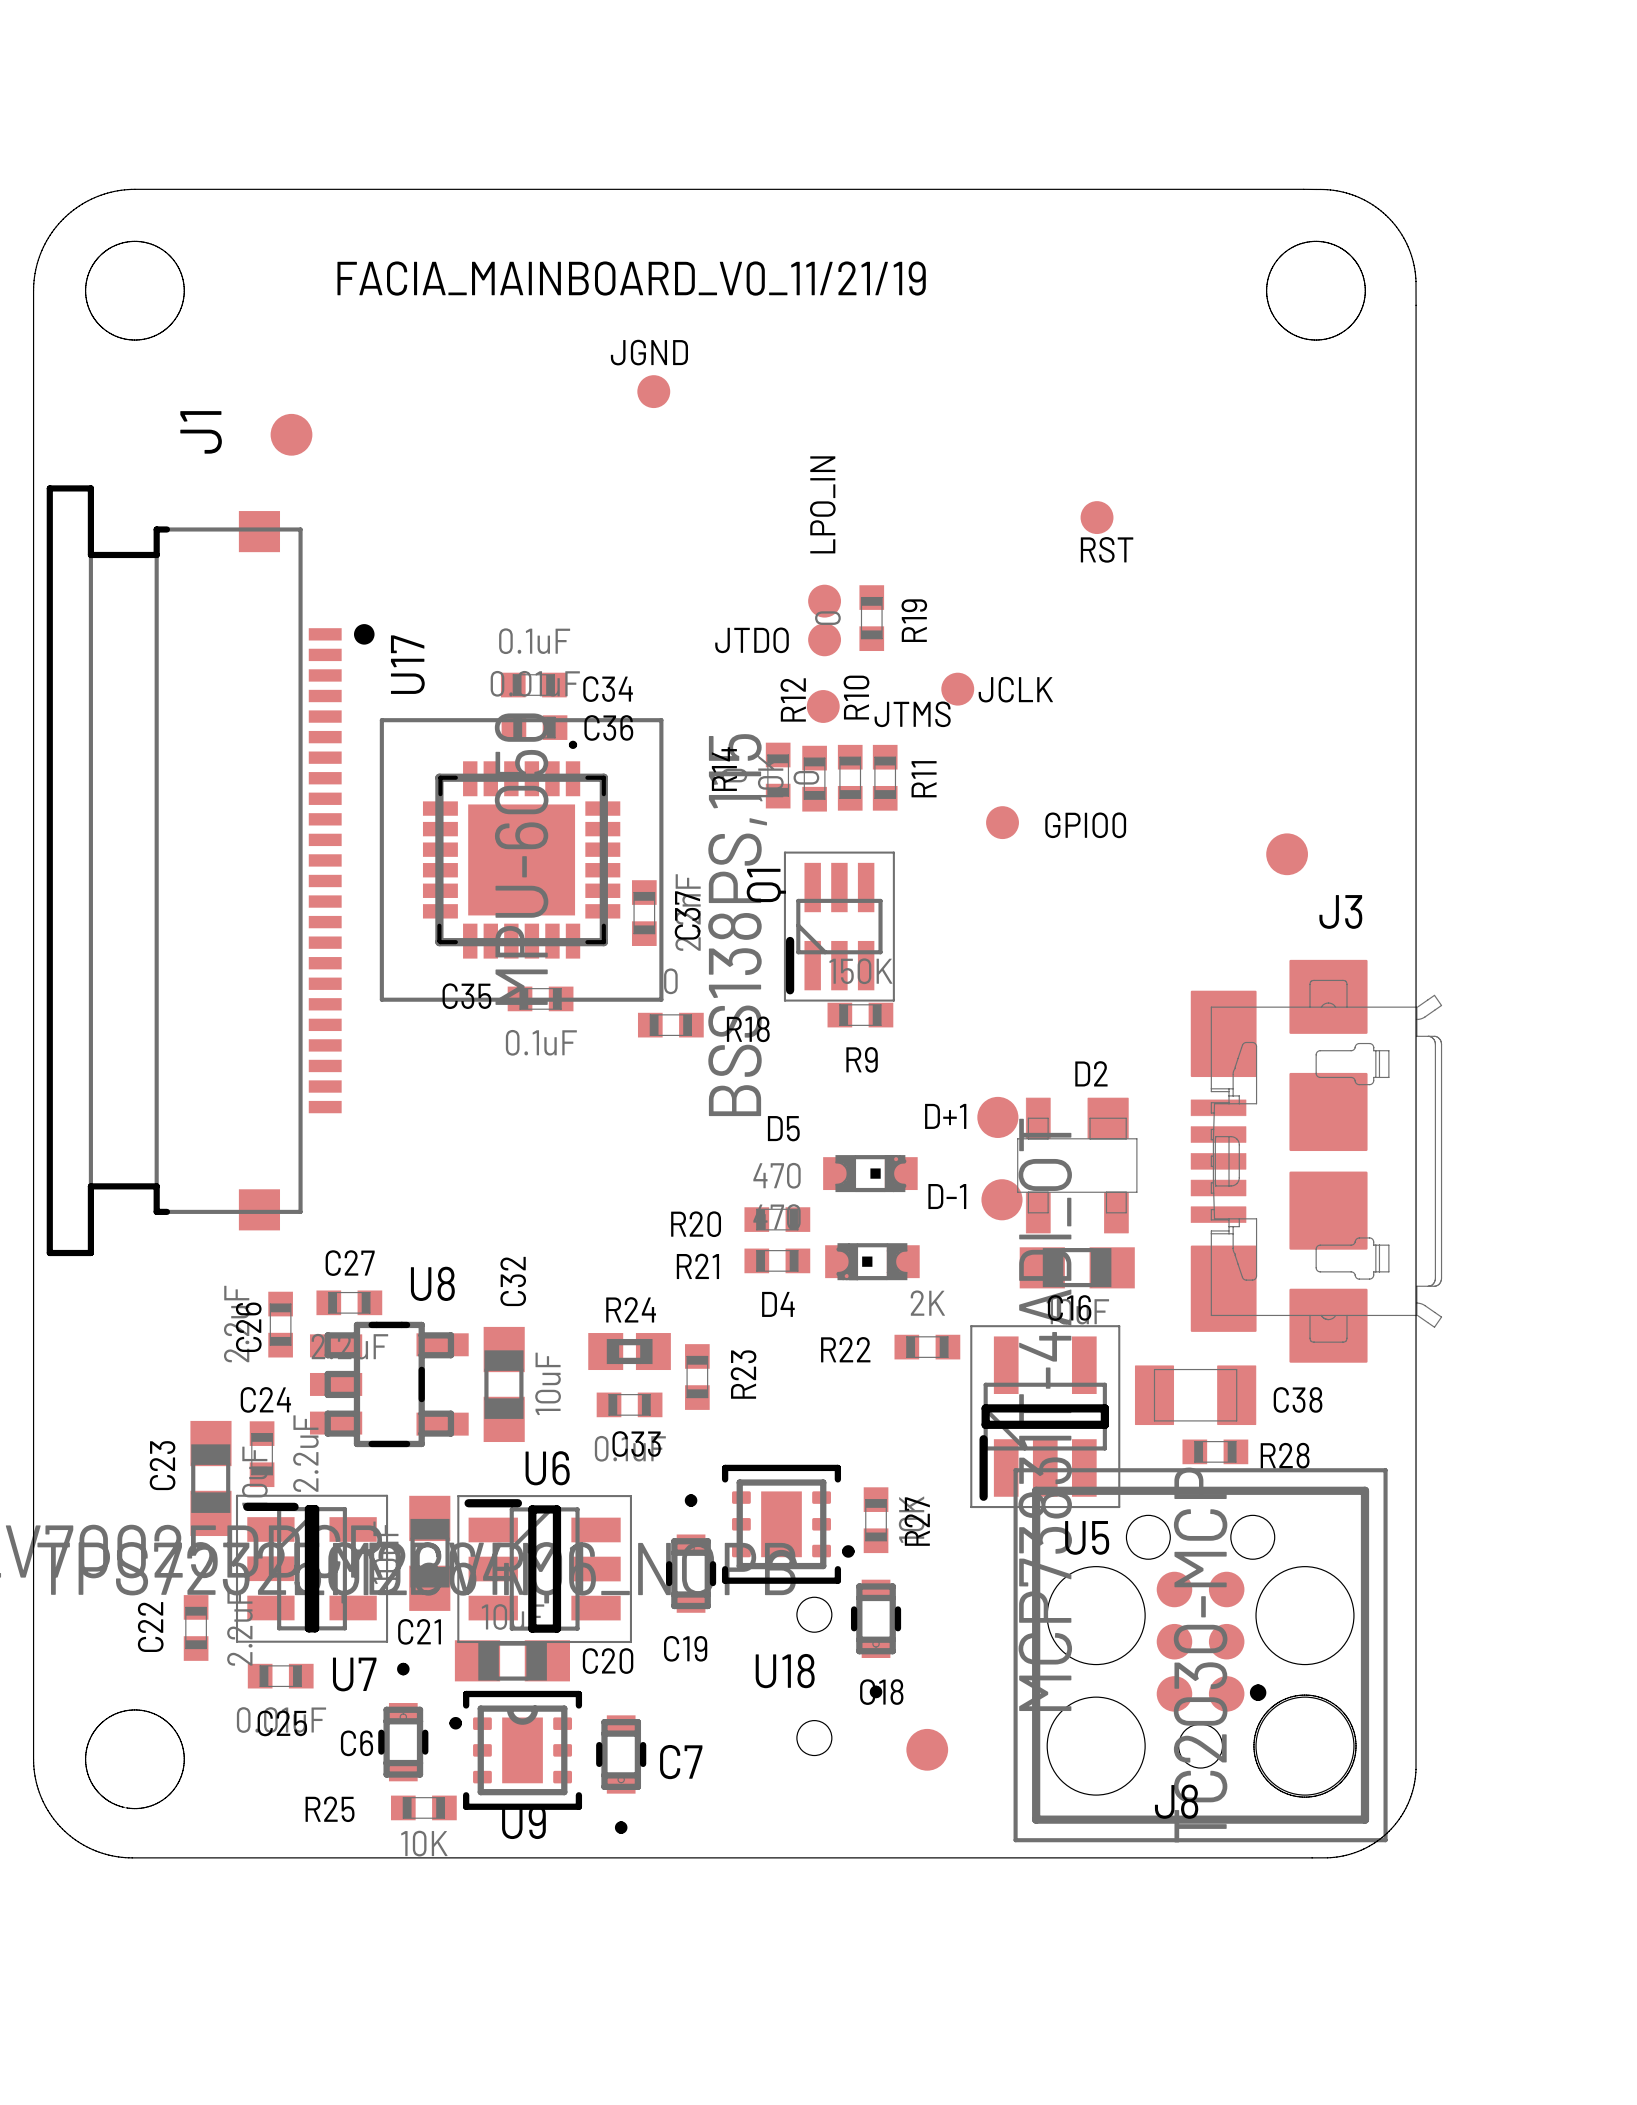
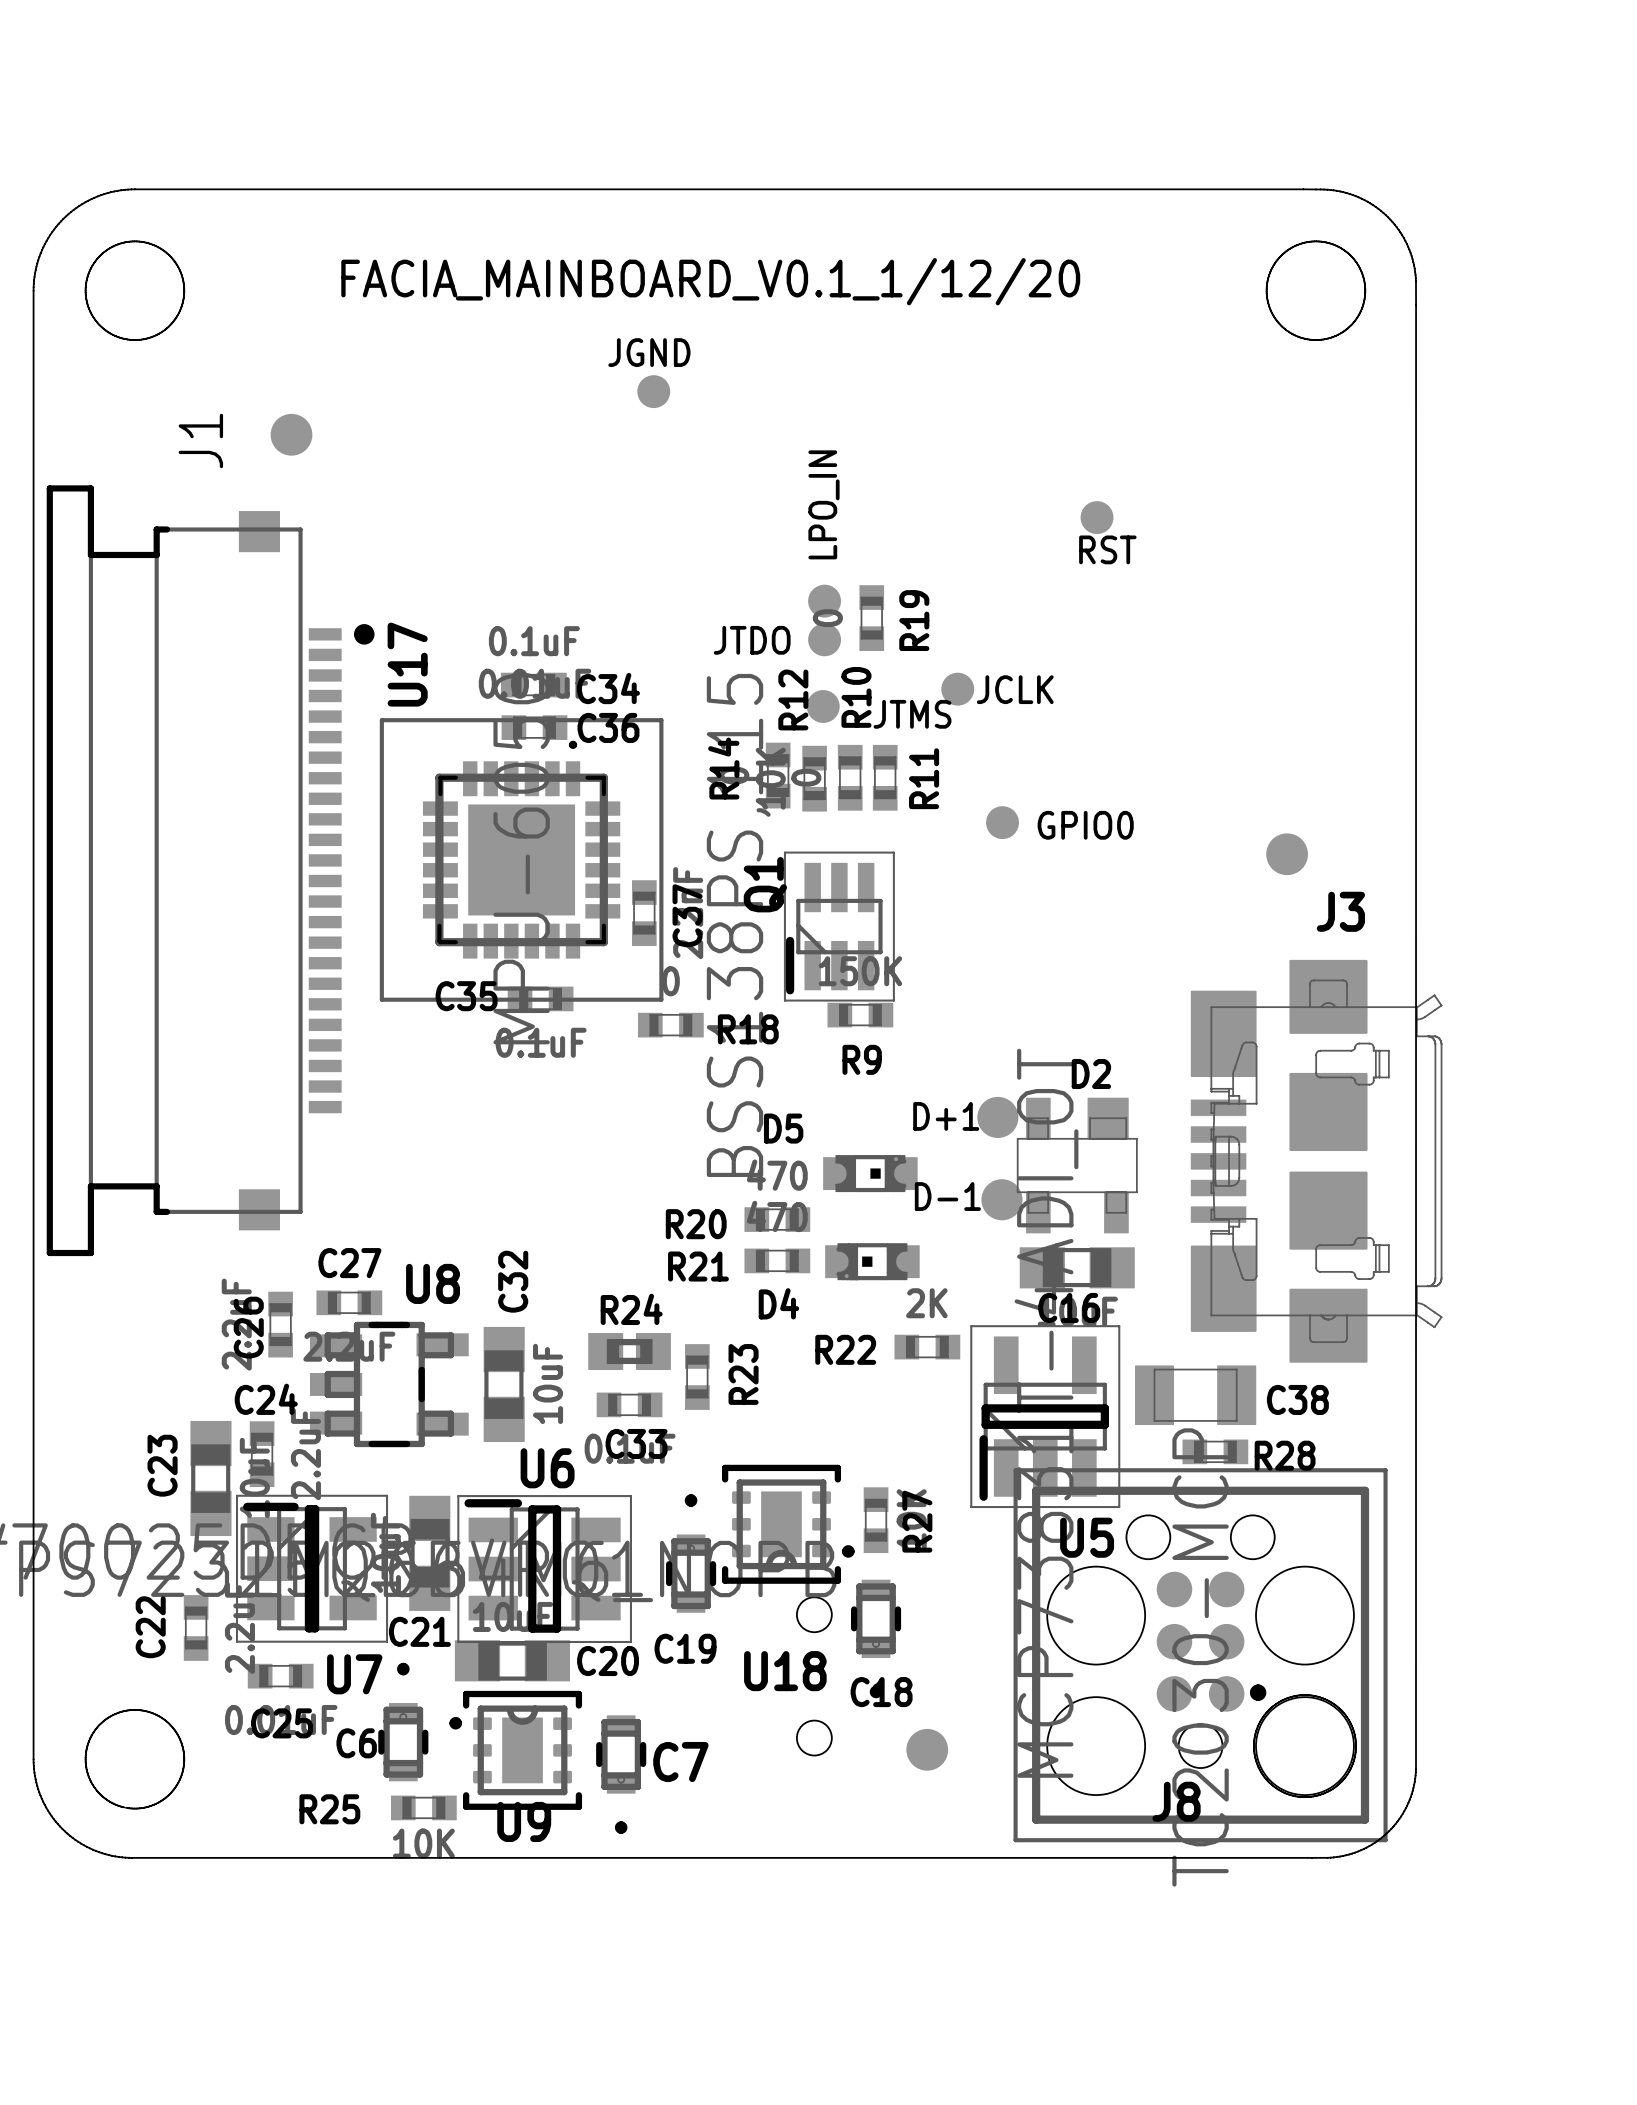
text: FACIA_MAINBOARD_V0_11/21/19 (631, 278) -> FACIA_MAINBOARD_V0.1_1/12/20 (710, 281)

